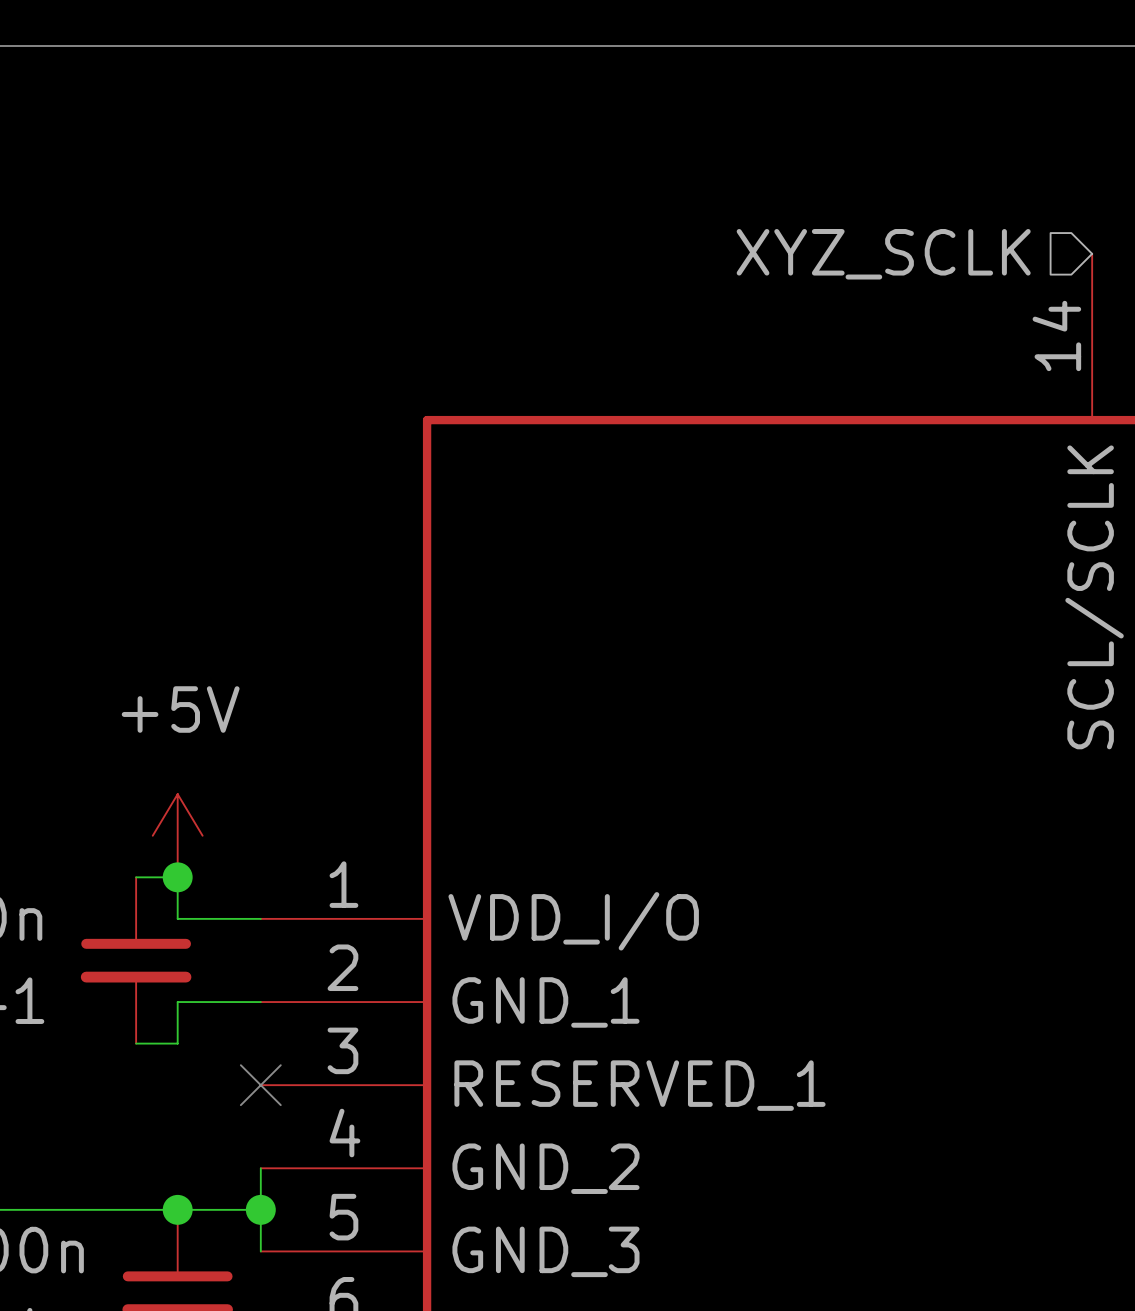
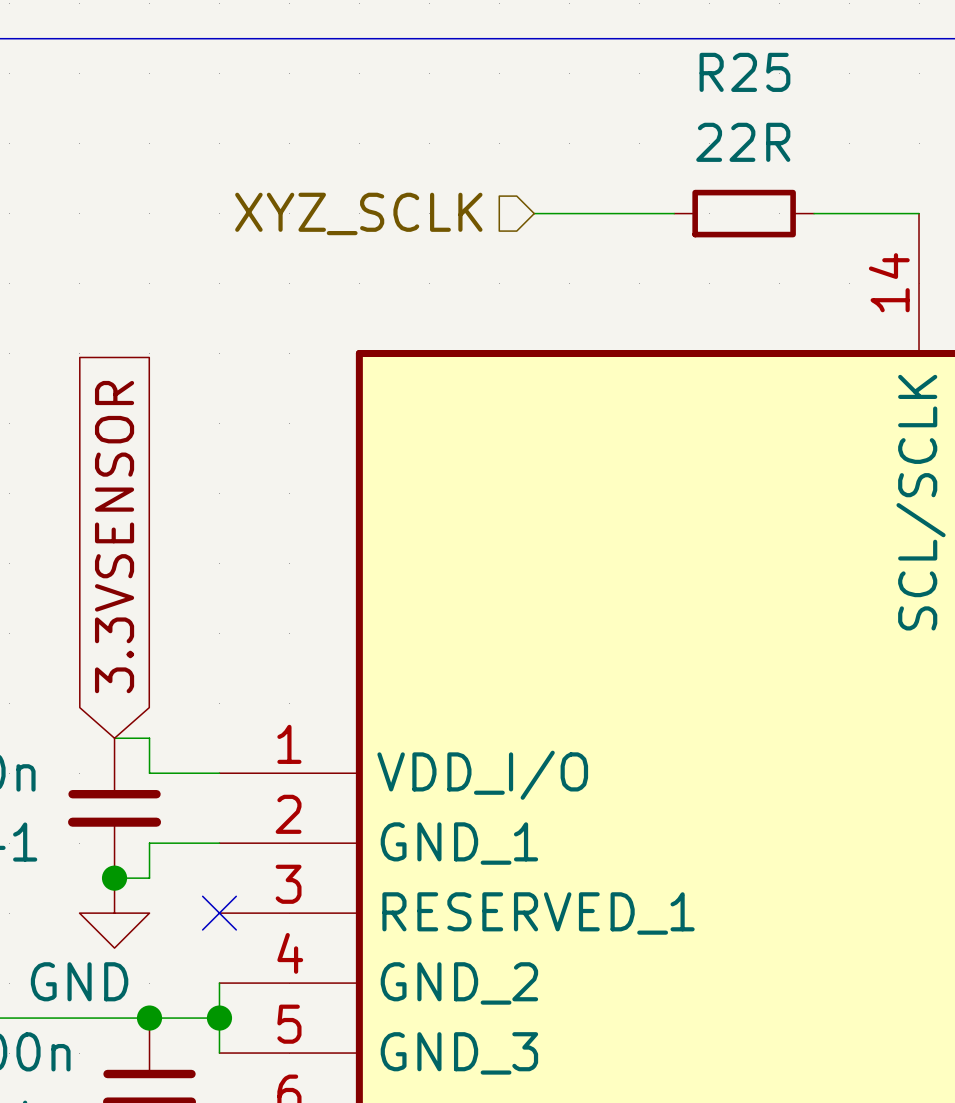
wire: none -> (534, 213) (674, 213)
R25: none -> 22R (744, 213)
wire: none -> (814, 213) (919, 213)
hierarchical label position: XYZ_SCLK (883, 254) -> XYZ_SCLK (358, 213)
global label: none -> 3.3VSENSOR (114, 537)
power symbol: +5V (177, 835) -> none
junction position: (177, 877) -> (114, 878)
power symbol: none -> GND (114, 913)

